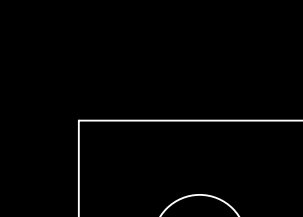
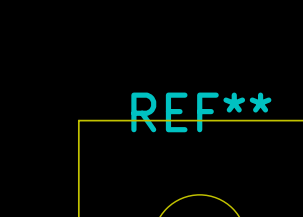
REF** name: none -> REF** (201, 112)

